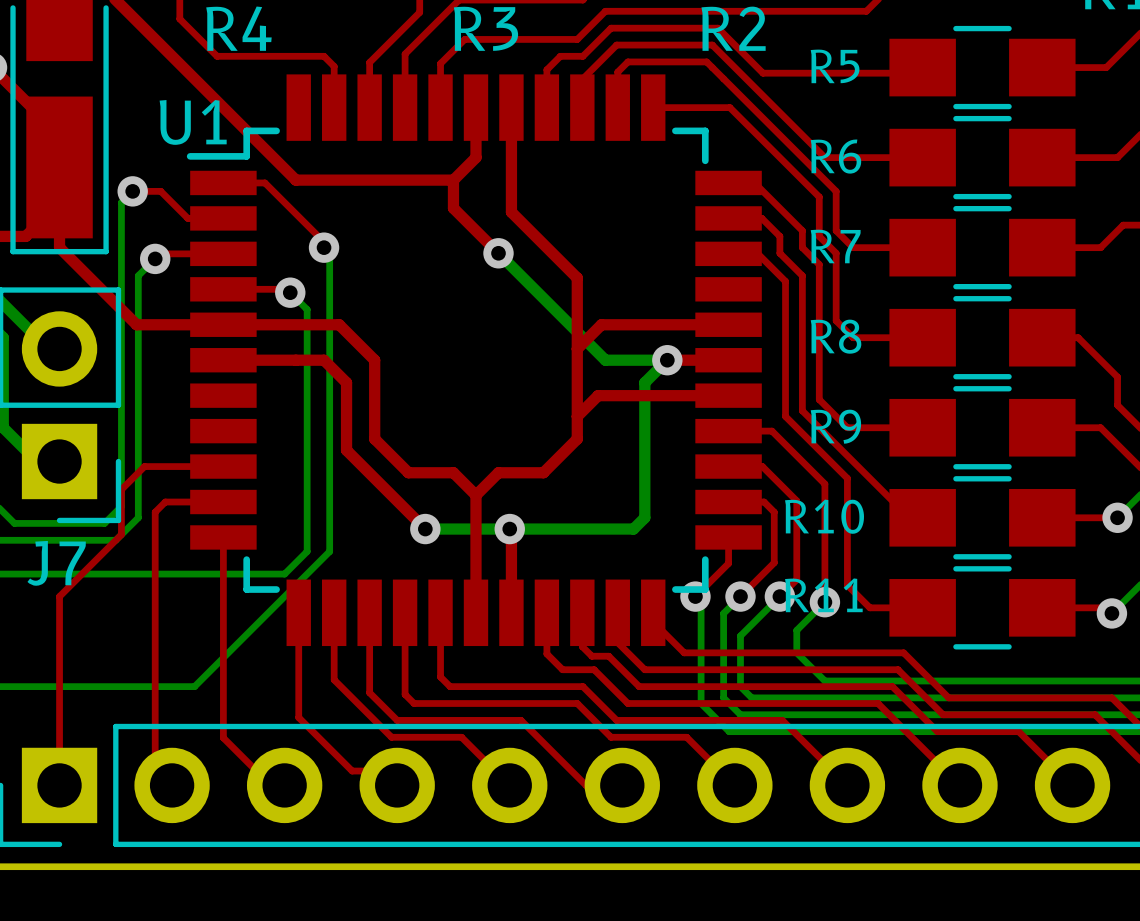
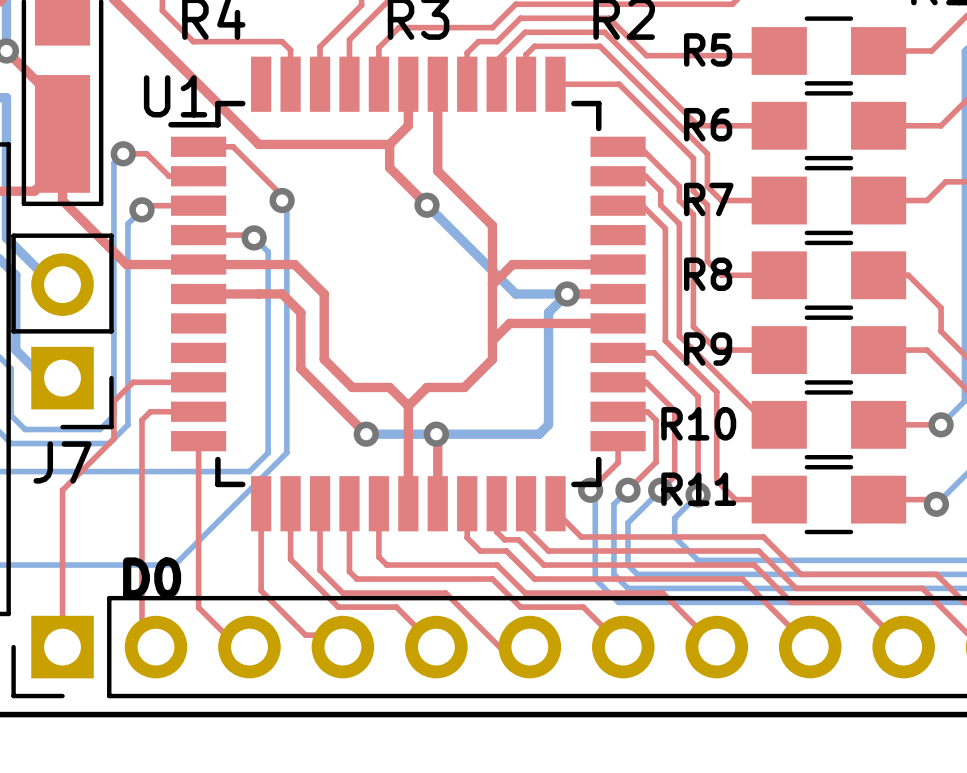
text: none -> D0 (152, 577)

